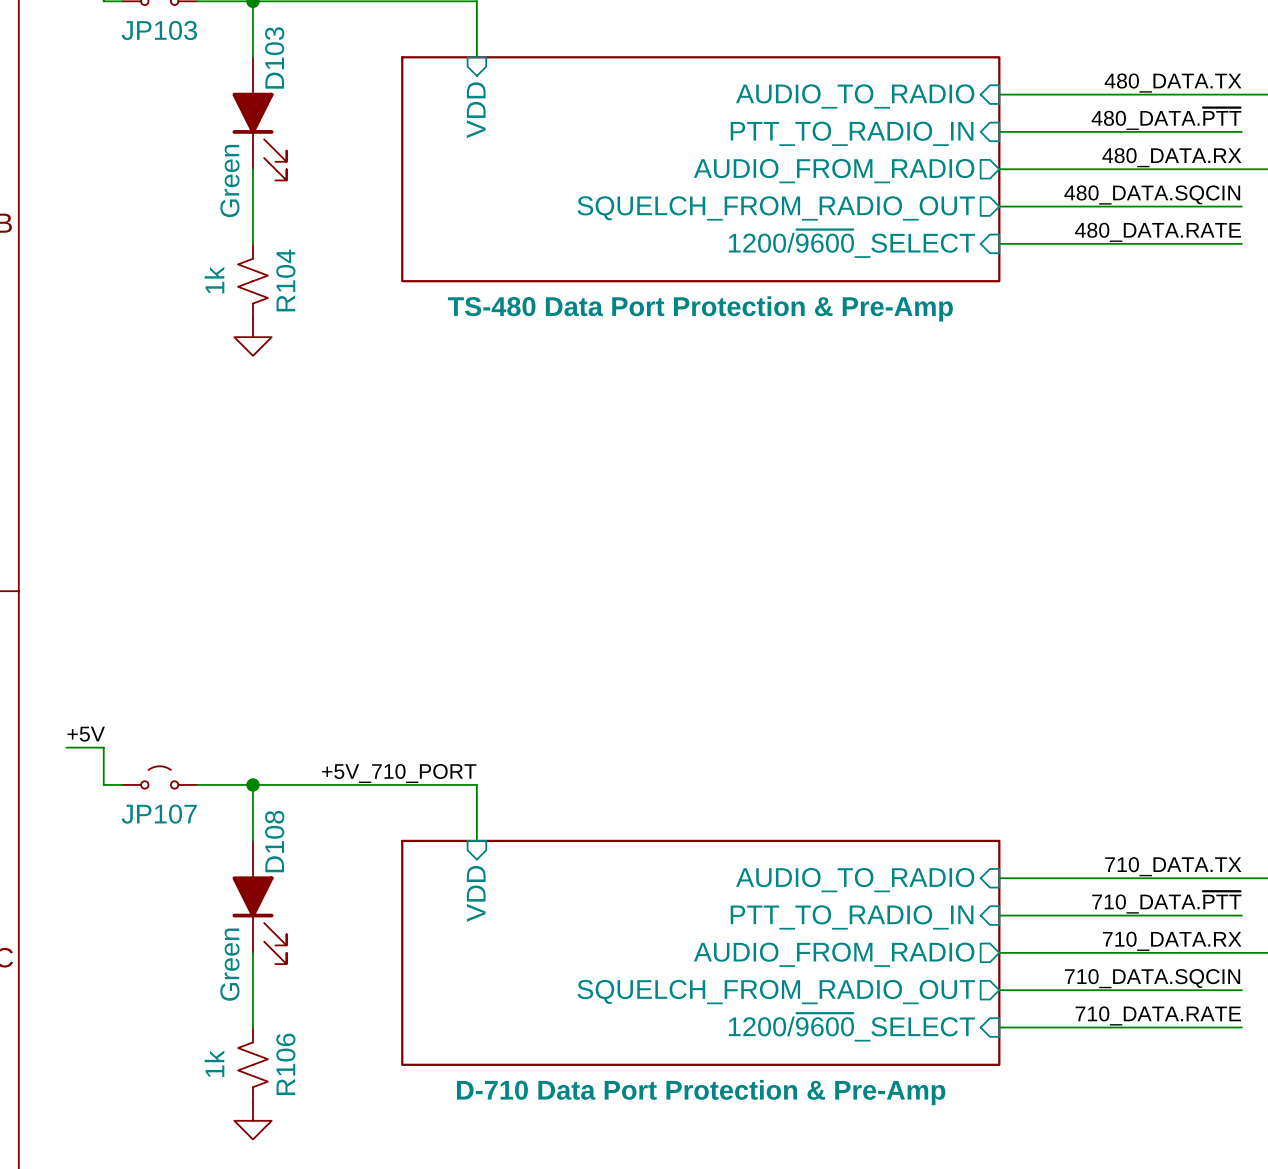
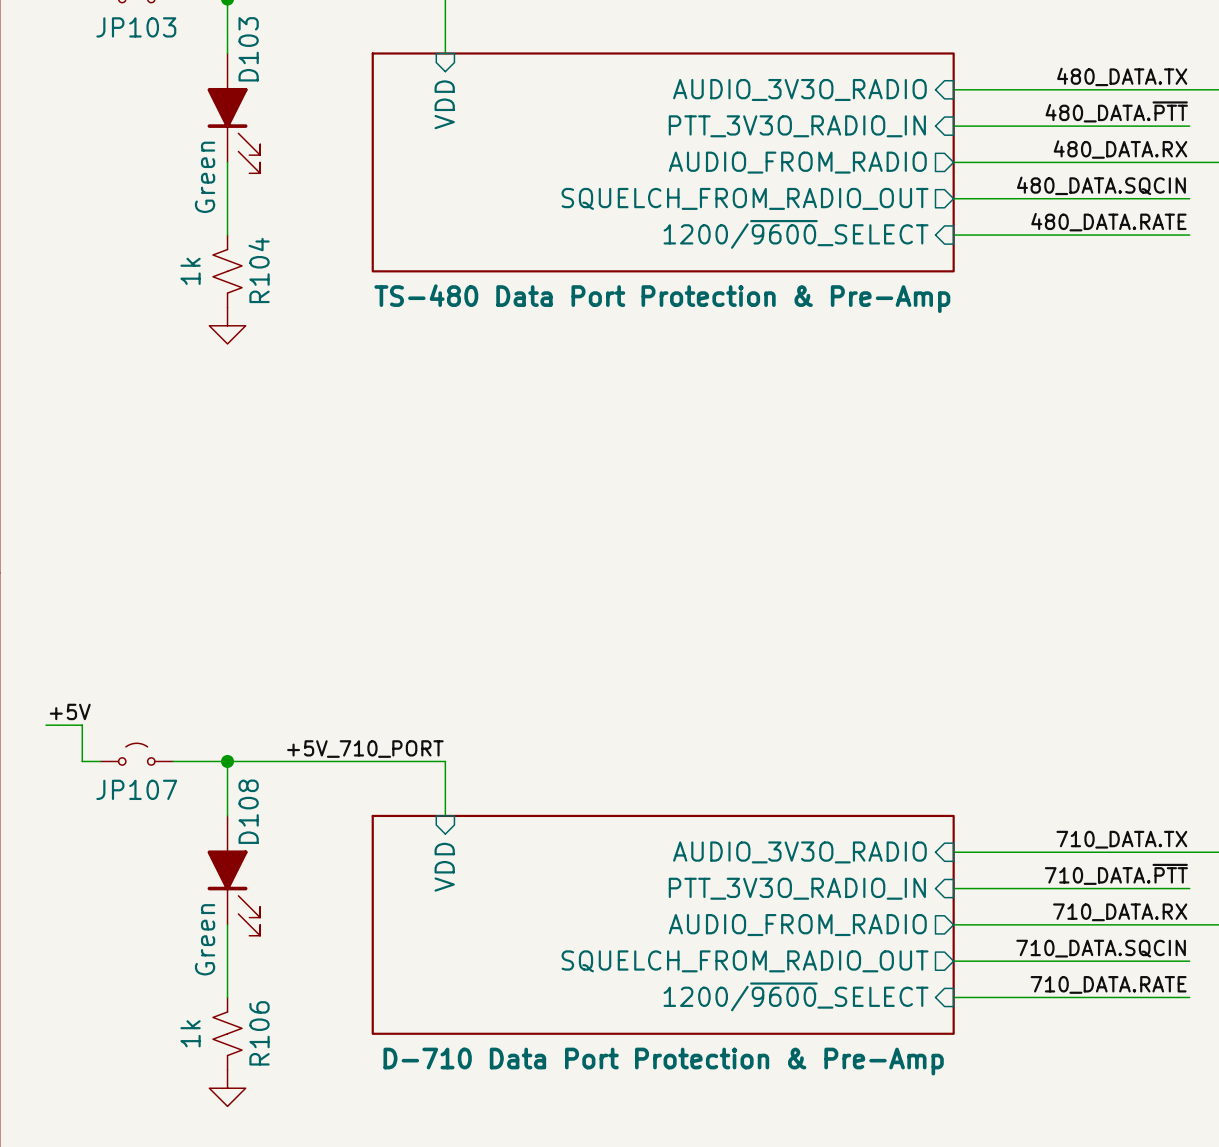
sheet pin: AUDIO_TO_RADIO (855, 96) -> AUDIO_3V3O_RADIO (799, 89)
sheet pin: PTT_TO_RADIO_IN (852, 133) -> PTT_3V3O_RADIO_IN (797, 126)
sheet pin: AUDIO_TO_RADIO (855, 880) -> AUDIO_3V3O_RADIO (799, 852)
sheet pin: PTT_TO_RADIO_IN (852, 917) -> PTT_3V3O_RADIO_IN (797, 888)

